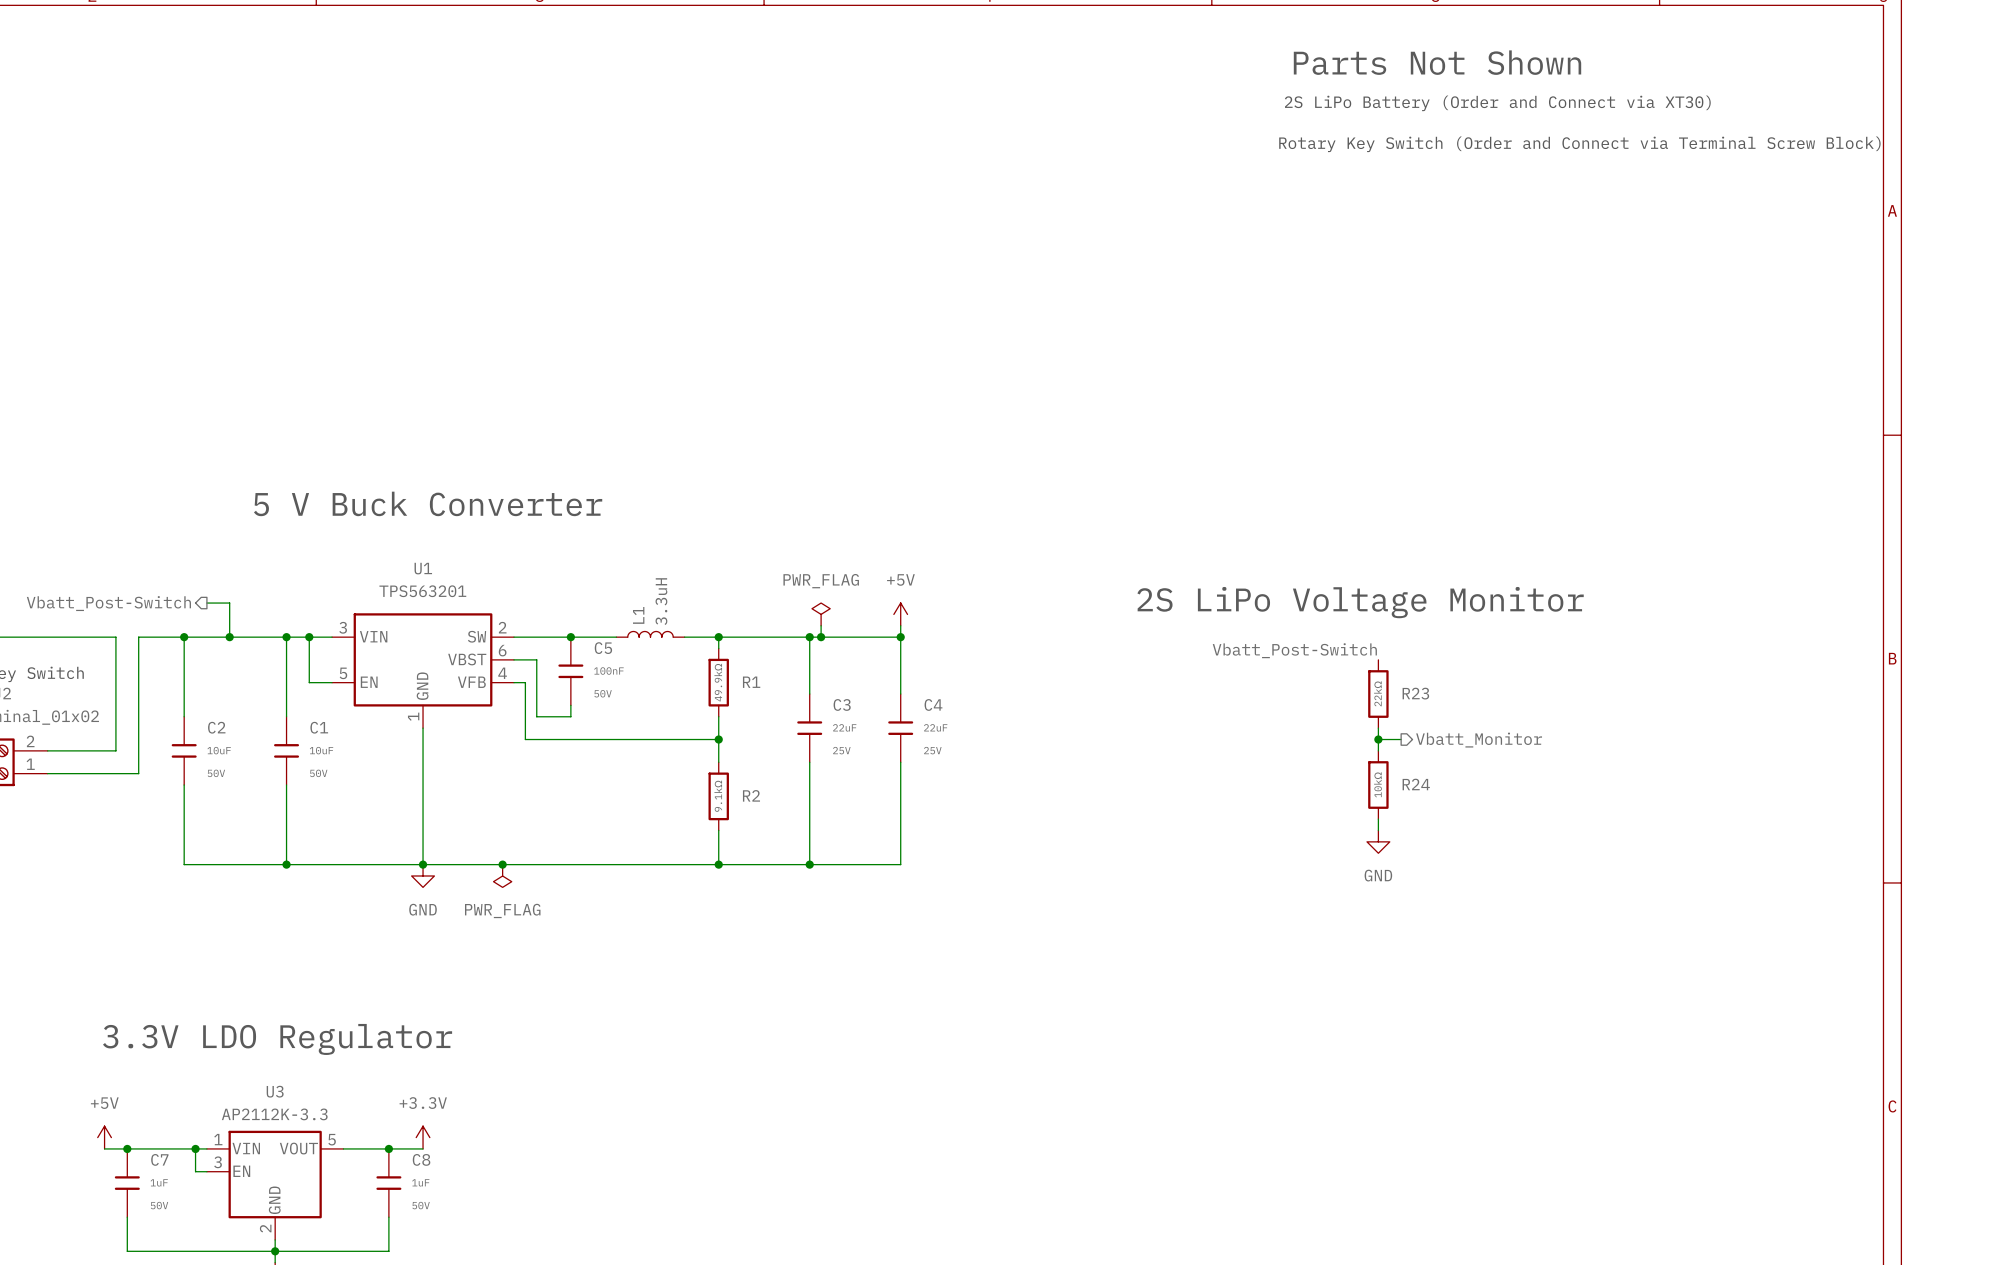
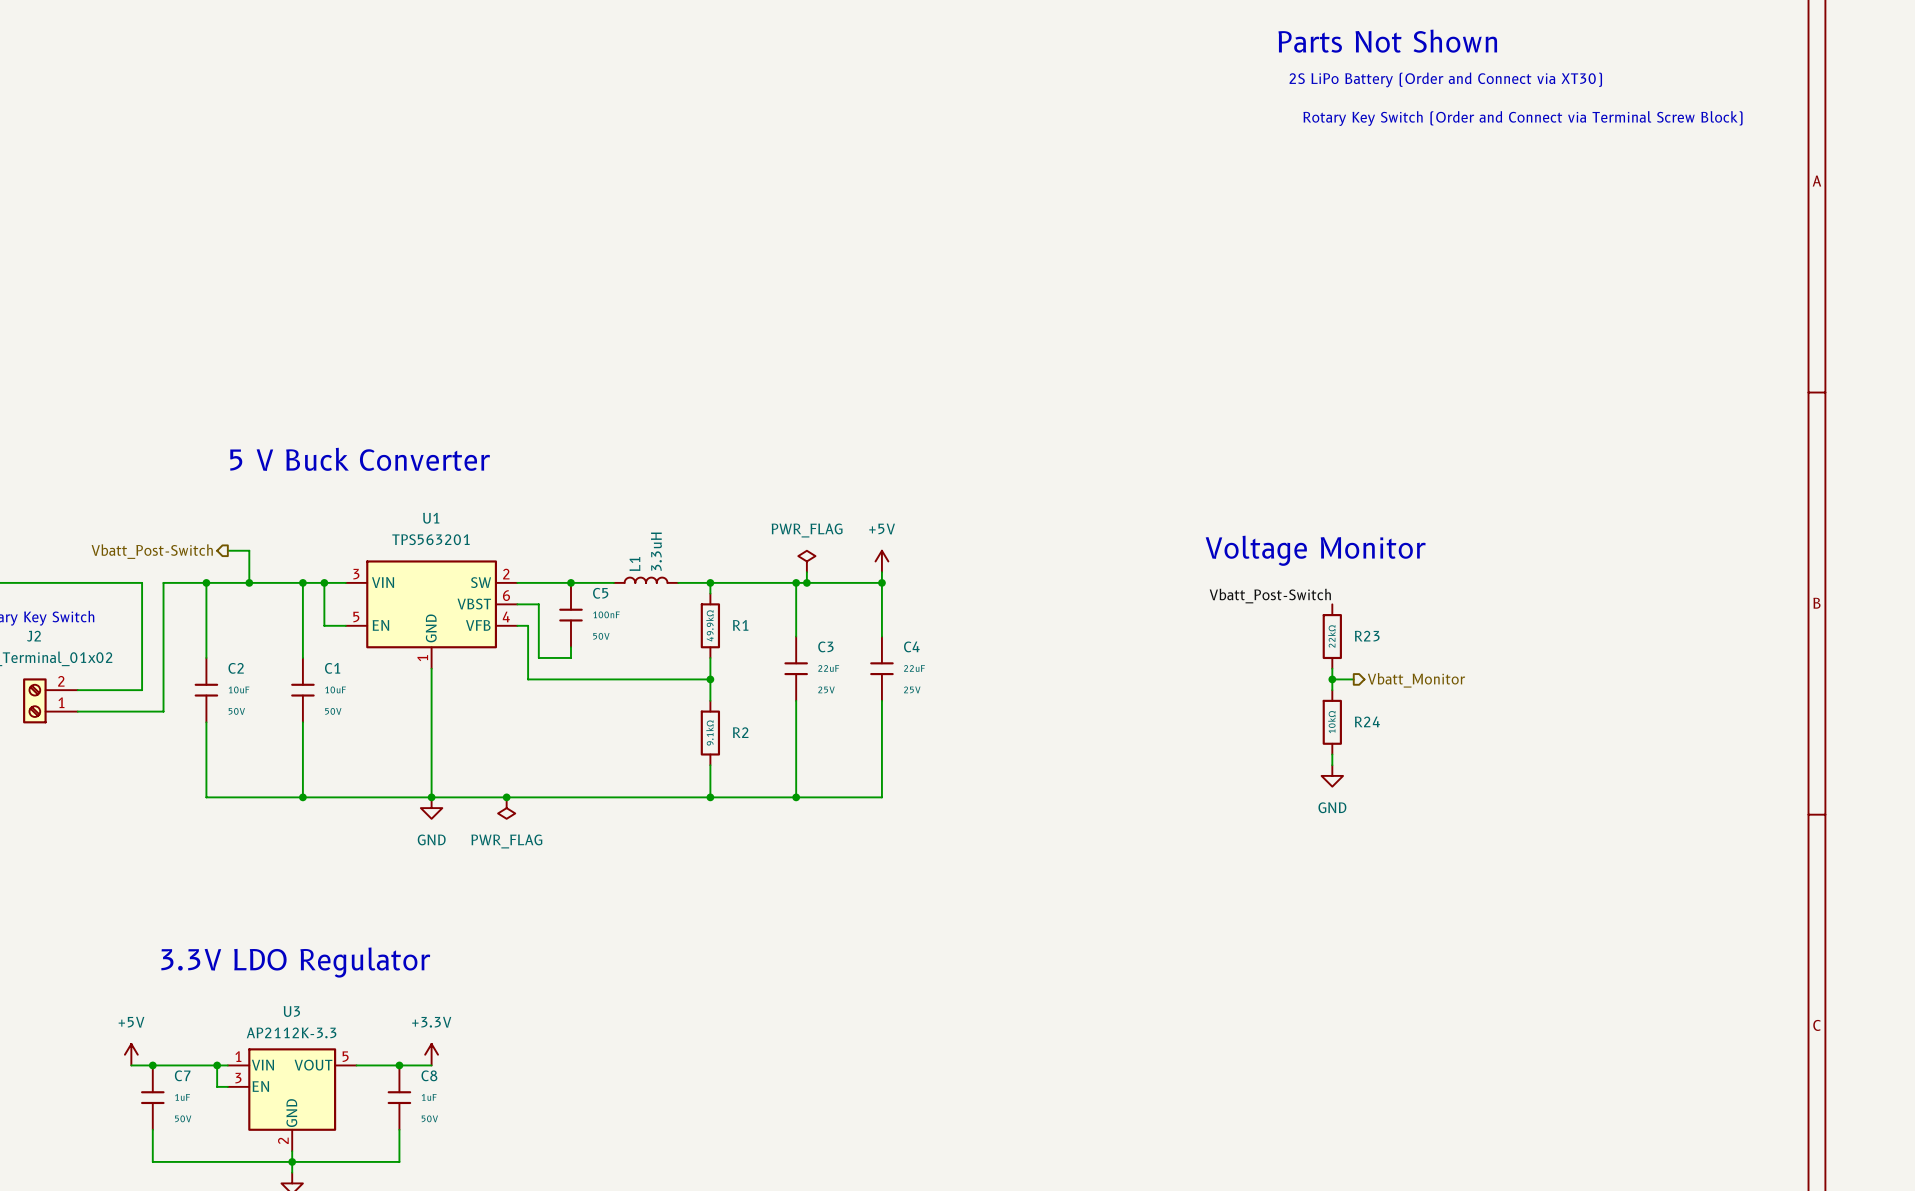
text position: 5 V Buck Converter (428, 503) -> 5 V Buck Converter (360, 459)
text: 2S LiPo Voltage Monitor (1360, 602) -> Voltage Monitor (1315, 550)

